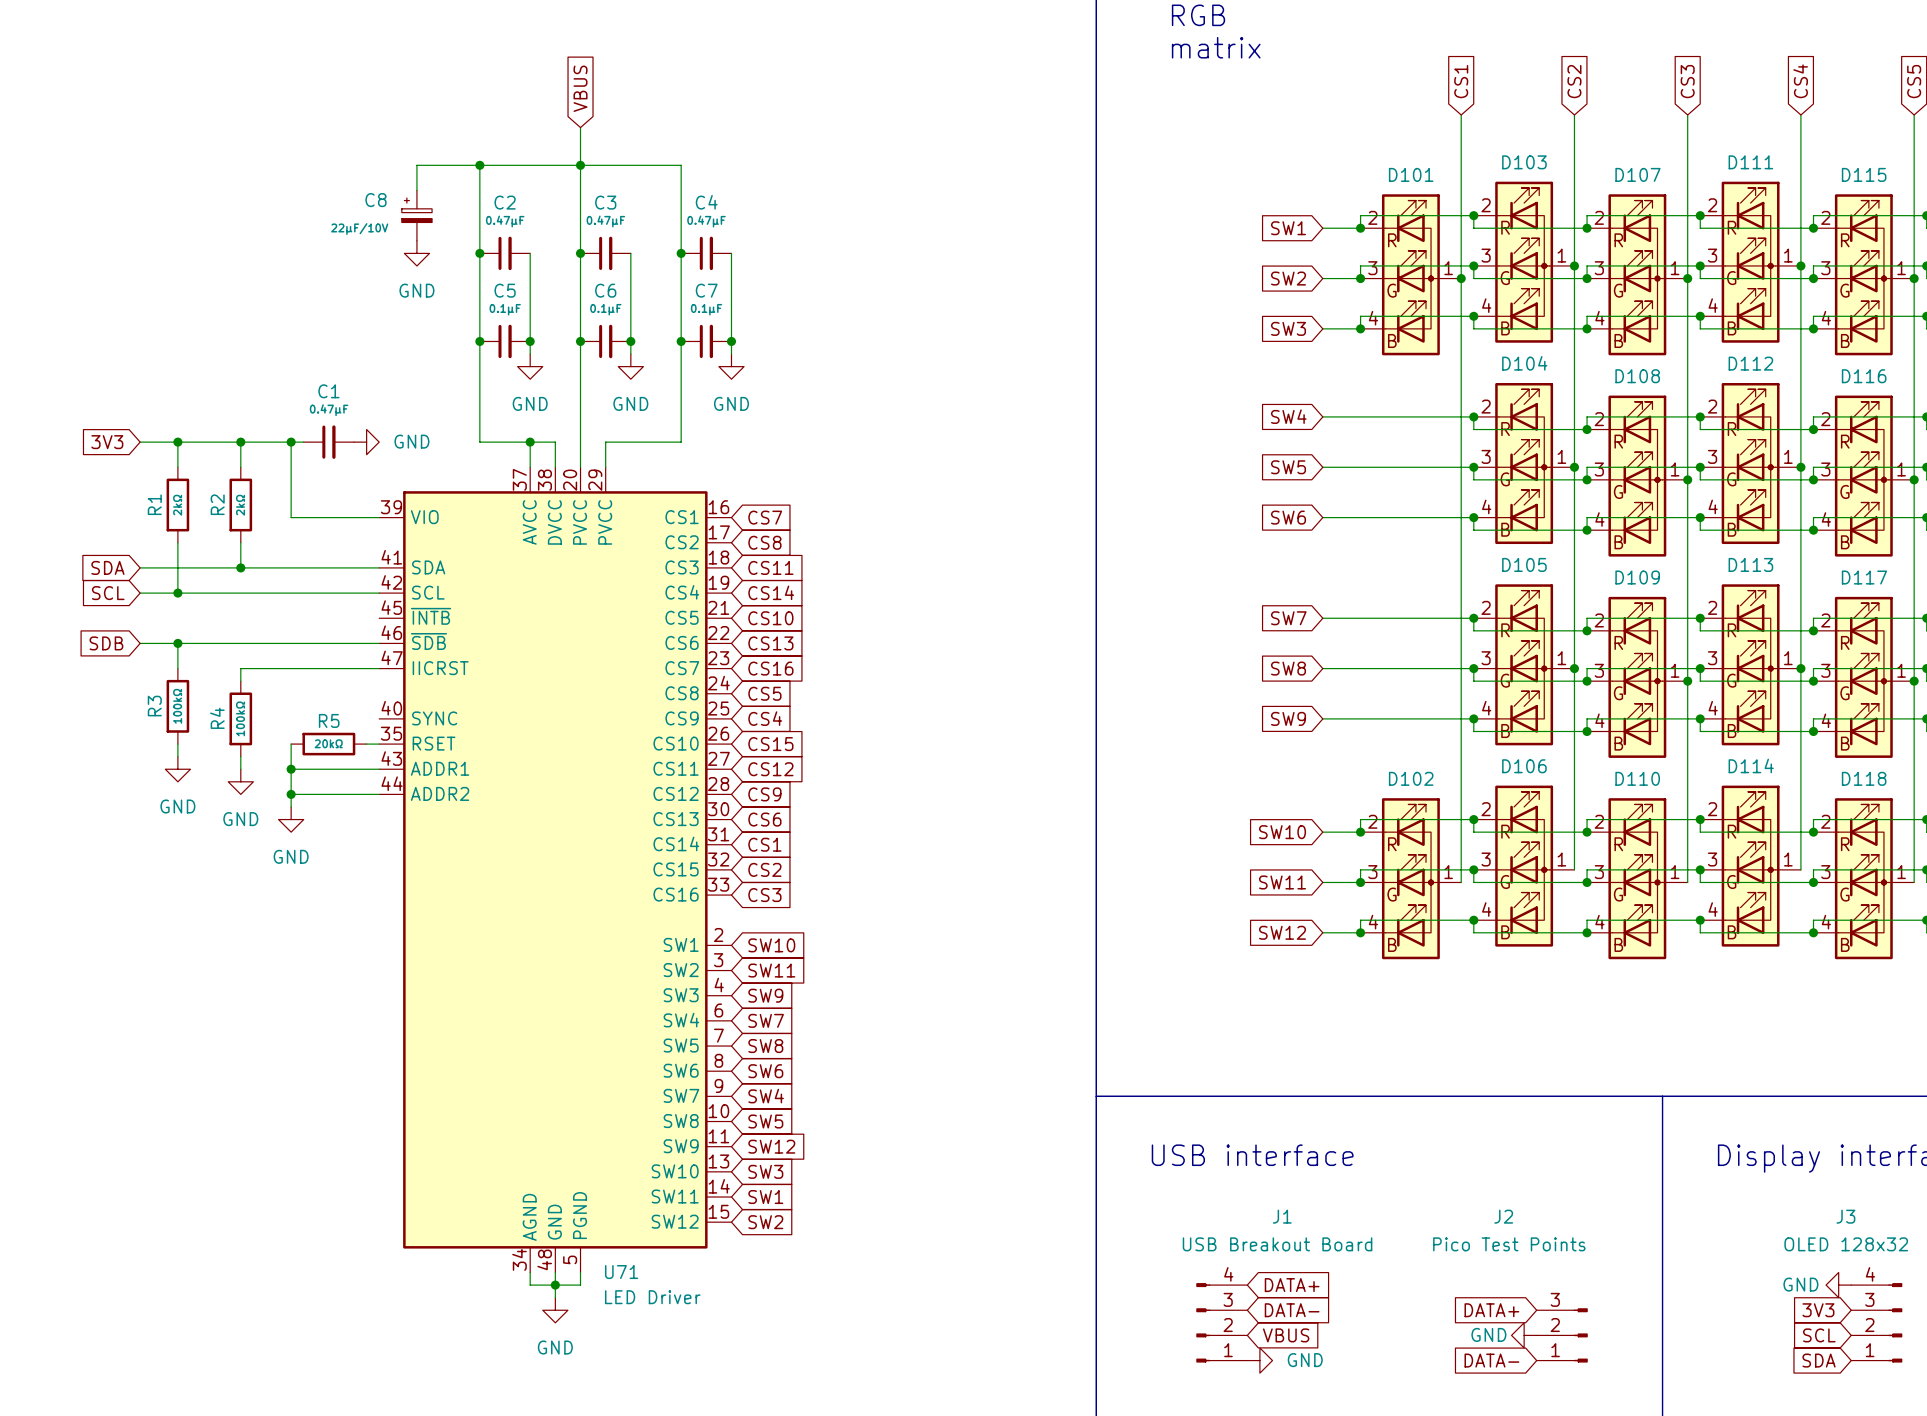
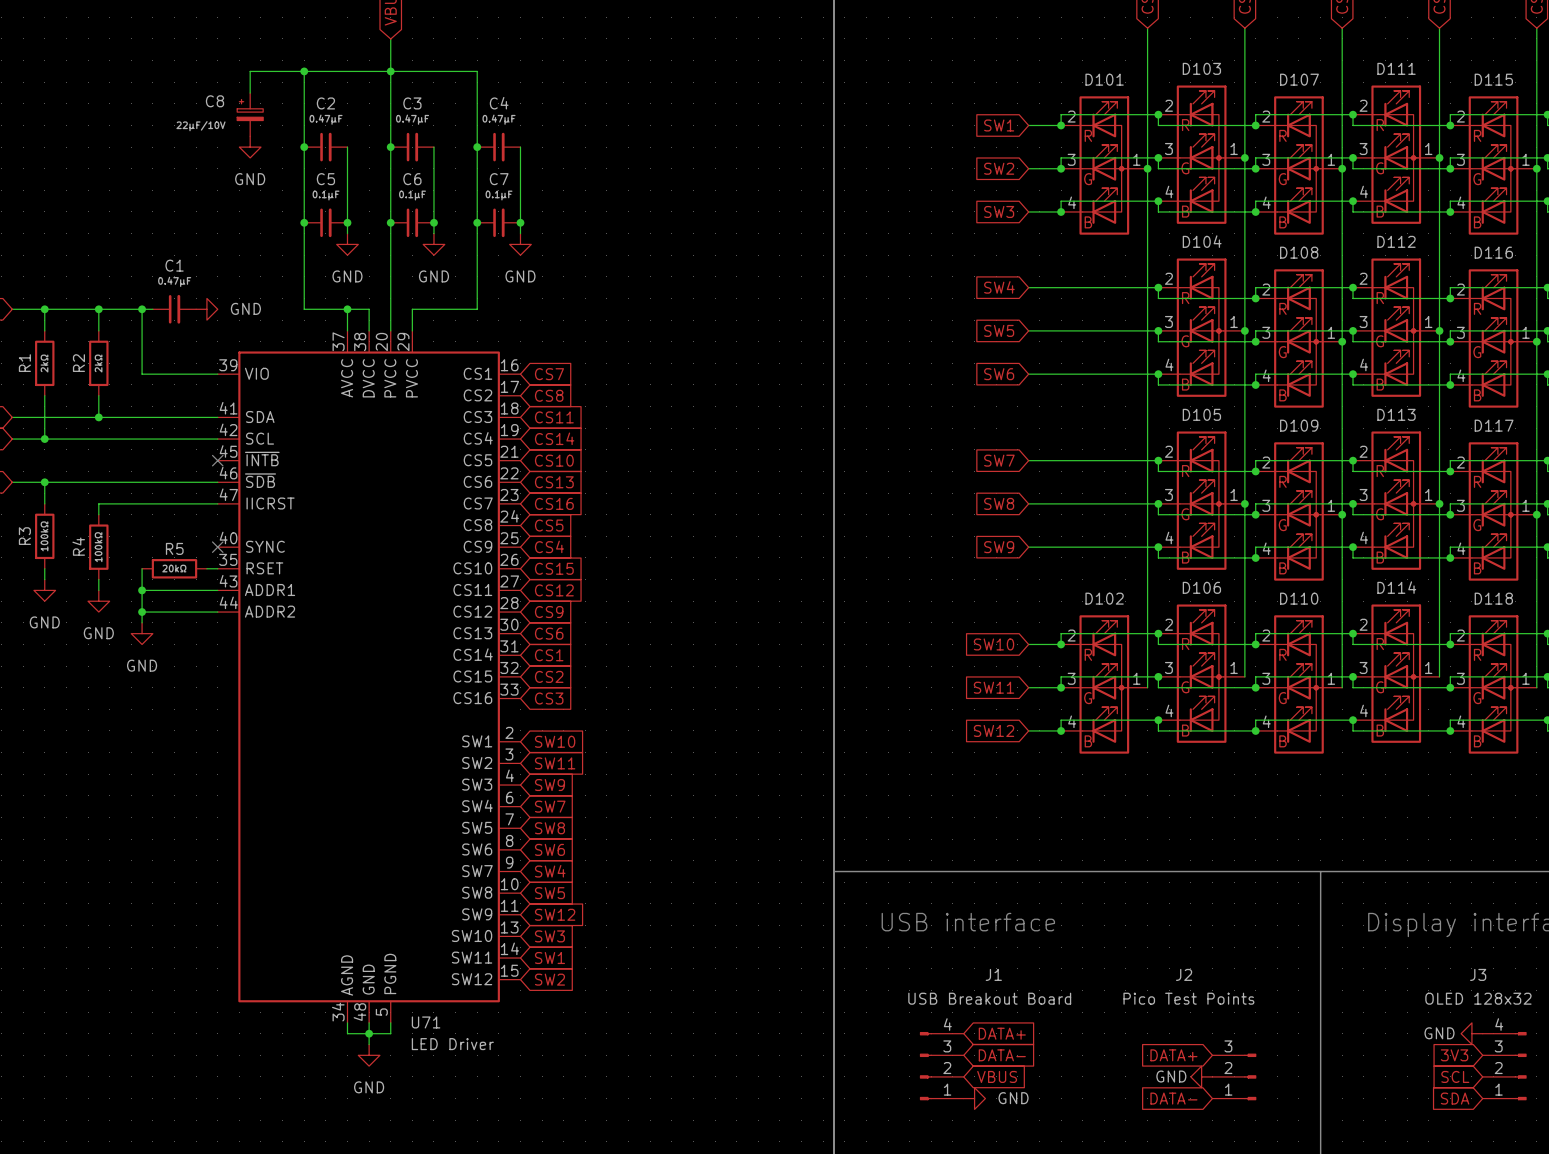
no-connect mark: none -> (217, 460)
no-connect mark: none -> (217, 547)

